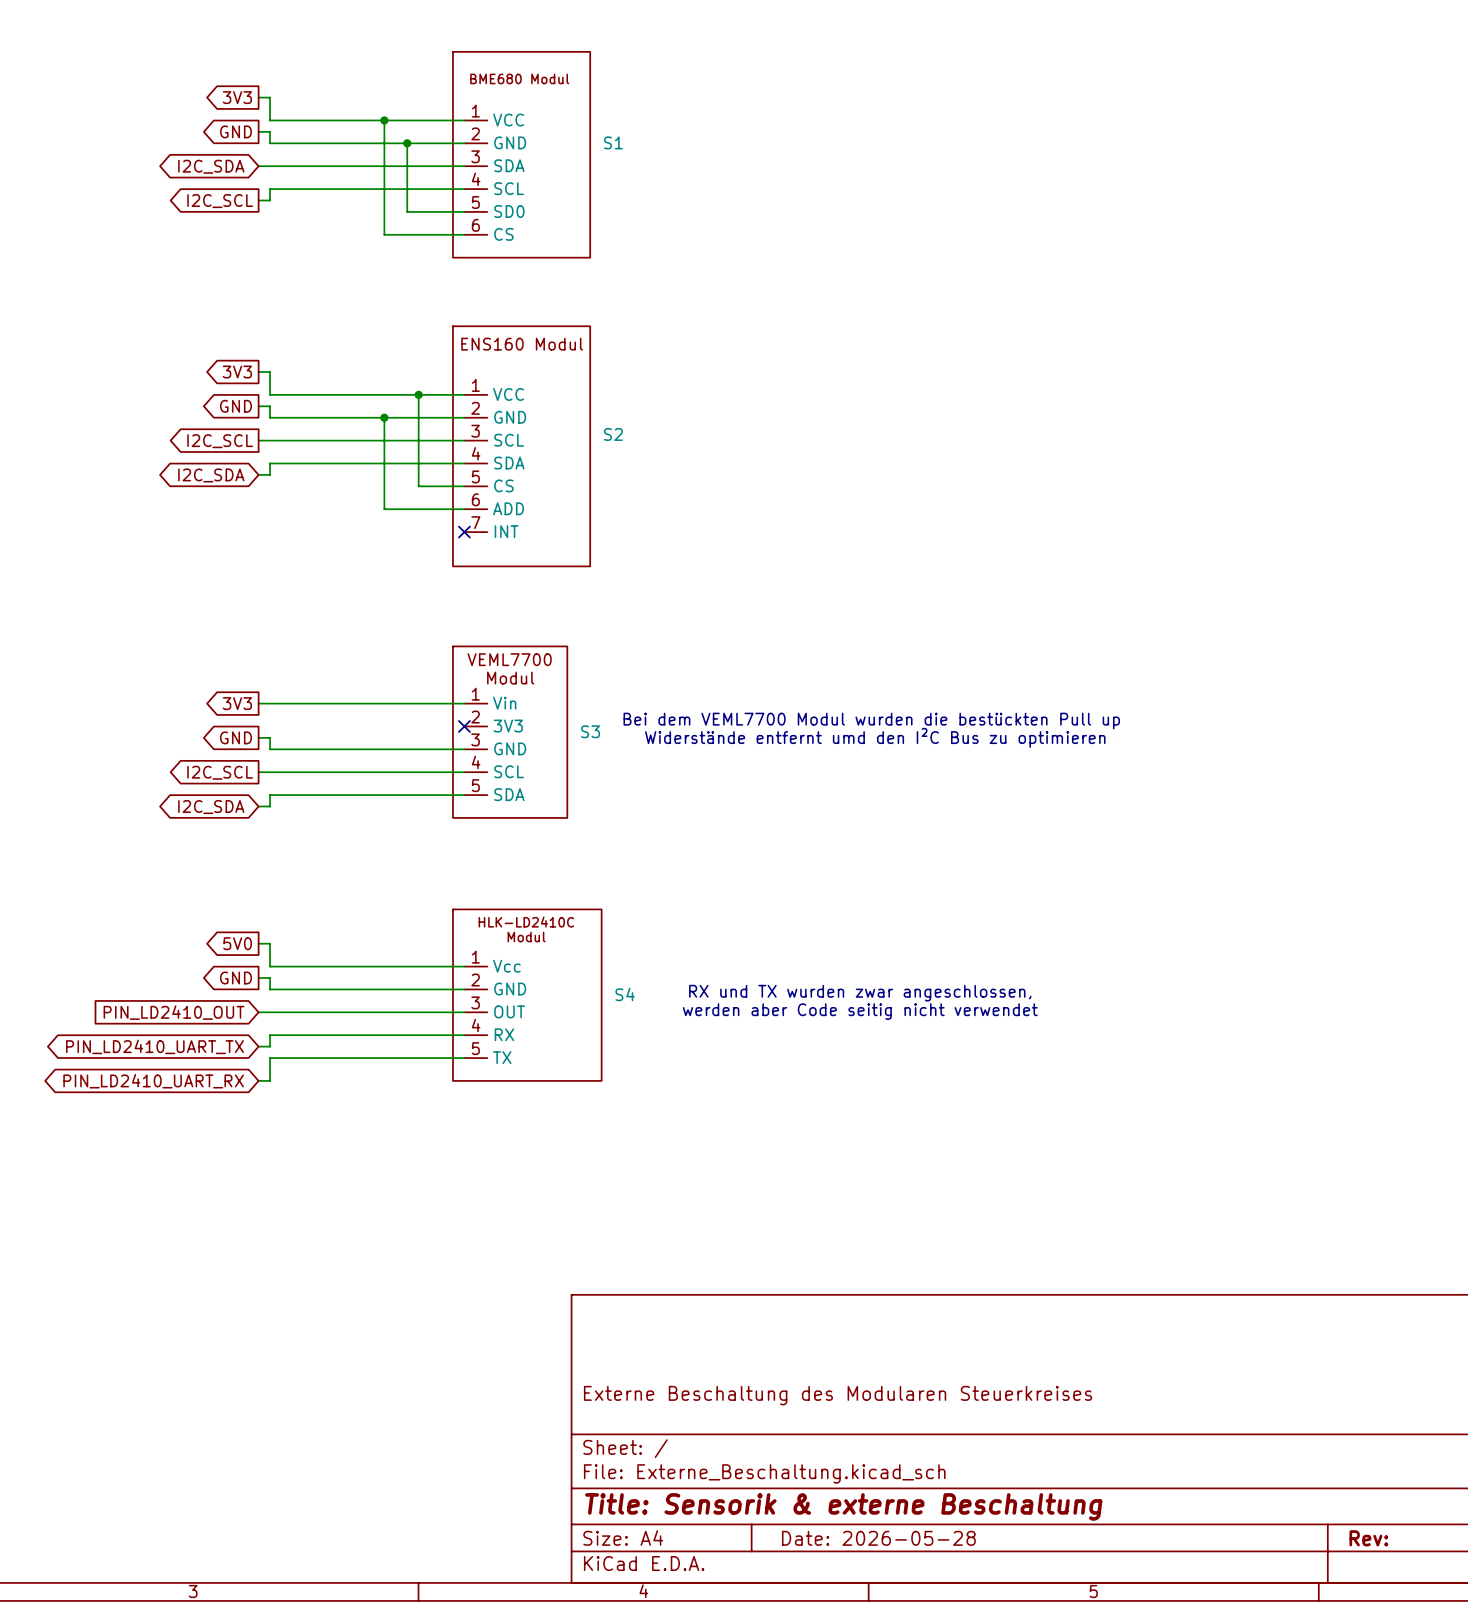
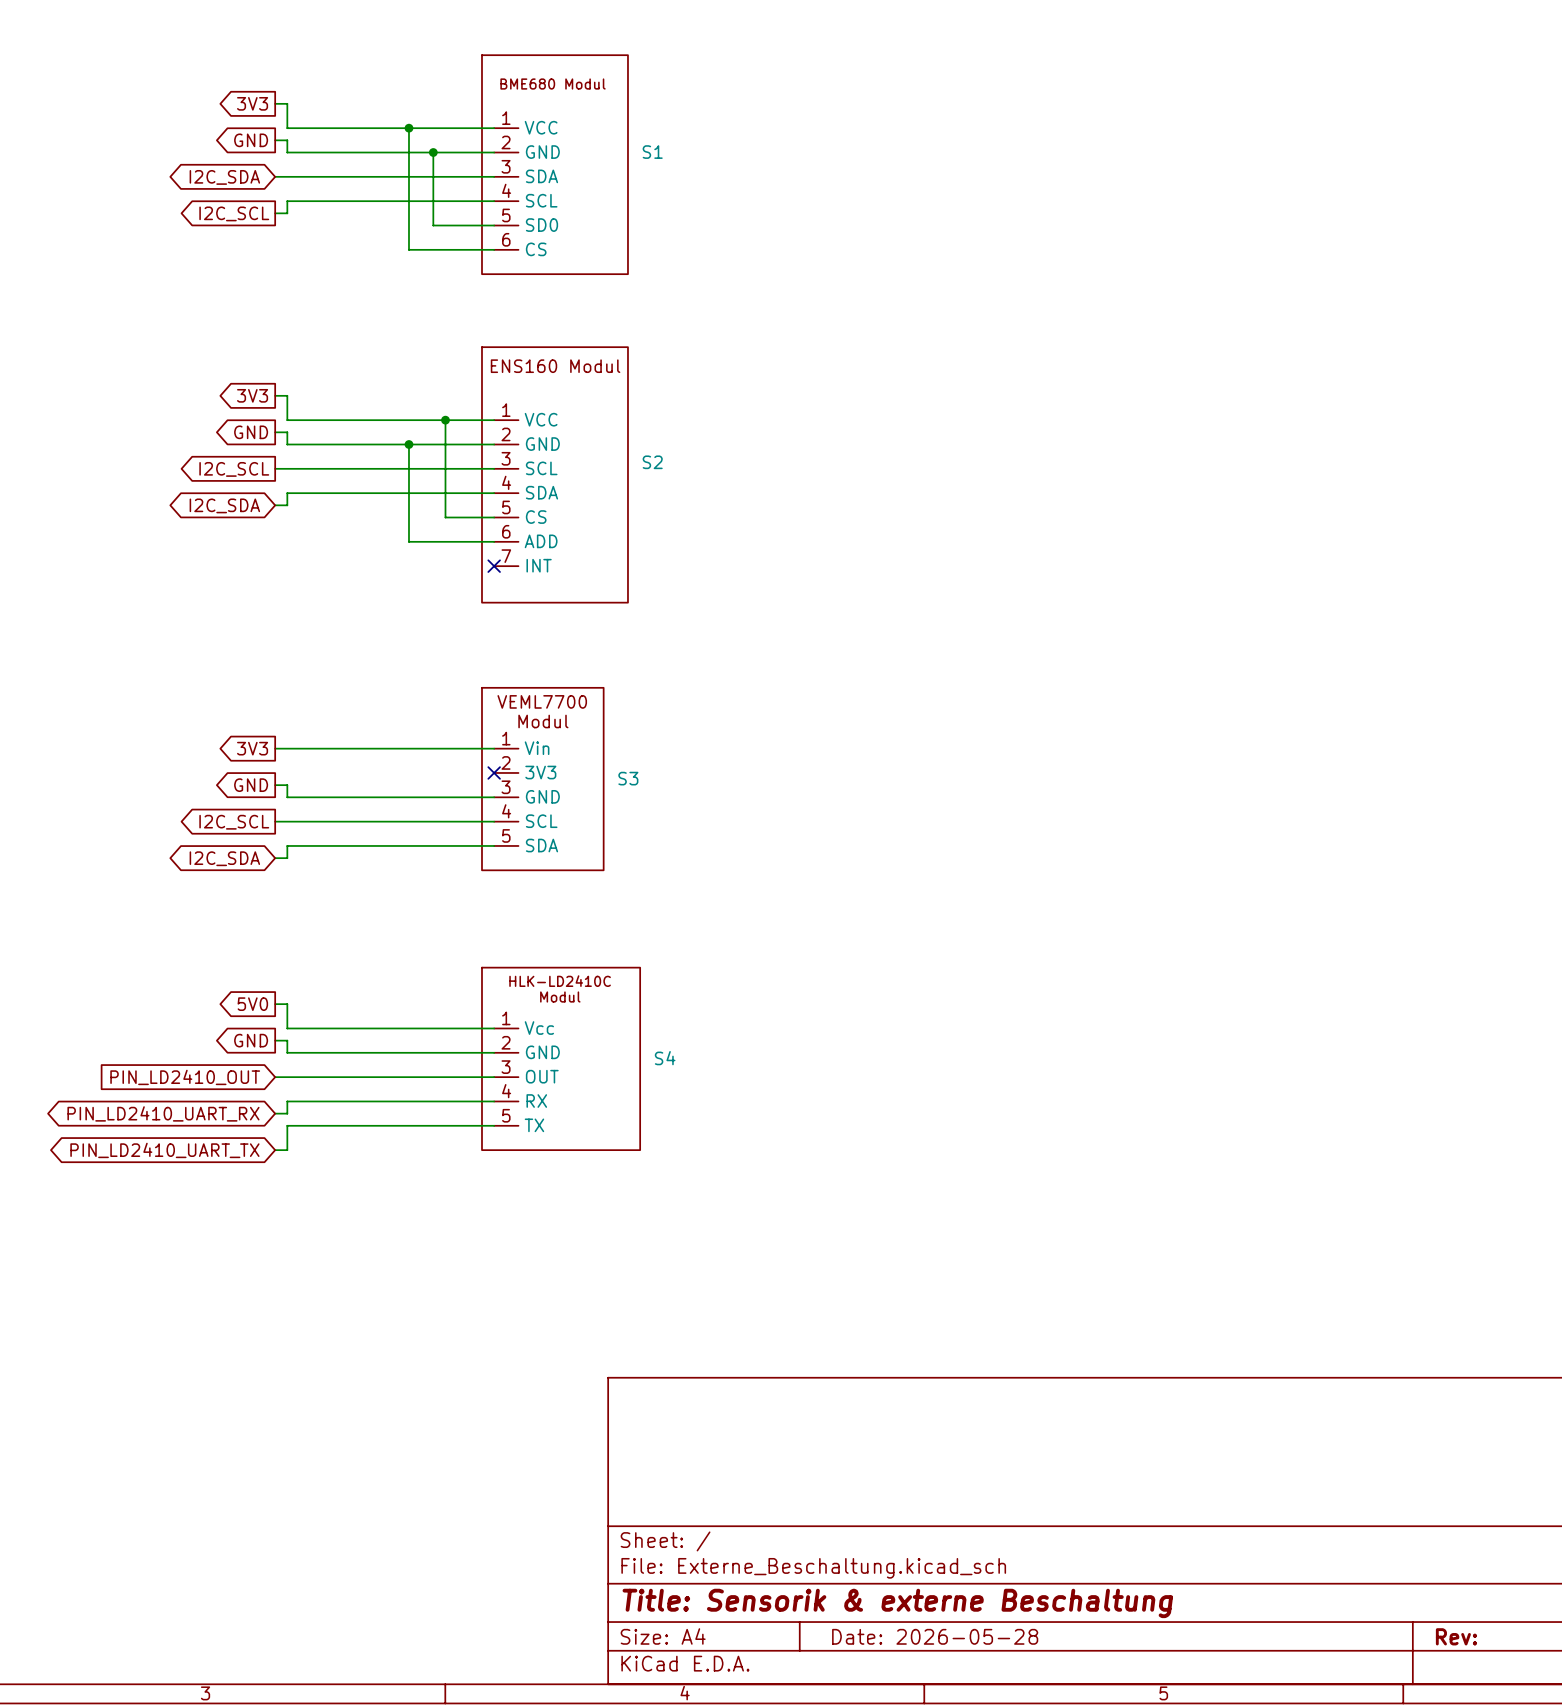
text: Bei dem VEML7700 Modul wurden die bestückten Pull up (871, 721) -> none
text: Widerstände entfernt umd den I²C Bus zu optimieren (875, 737) -> none
text: RX und TX wurden zwar angeschlossen, (860, 993) -> none
text: werden aber Code seitig nicht verwendet (860, 1011) -> none
global label: PIN_LD2410_UART_TX (155, 1046) -> PIN_LD2410_UART_RX (163, 1113)
global label: PIN_LD2410_UART_RX (153, 1081) -> PIN_LD2410_UART_TX (164, 1150)
title block: Externe Beschaltung des Modularen Steuerkreises (838, 1395) -> none

